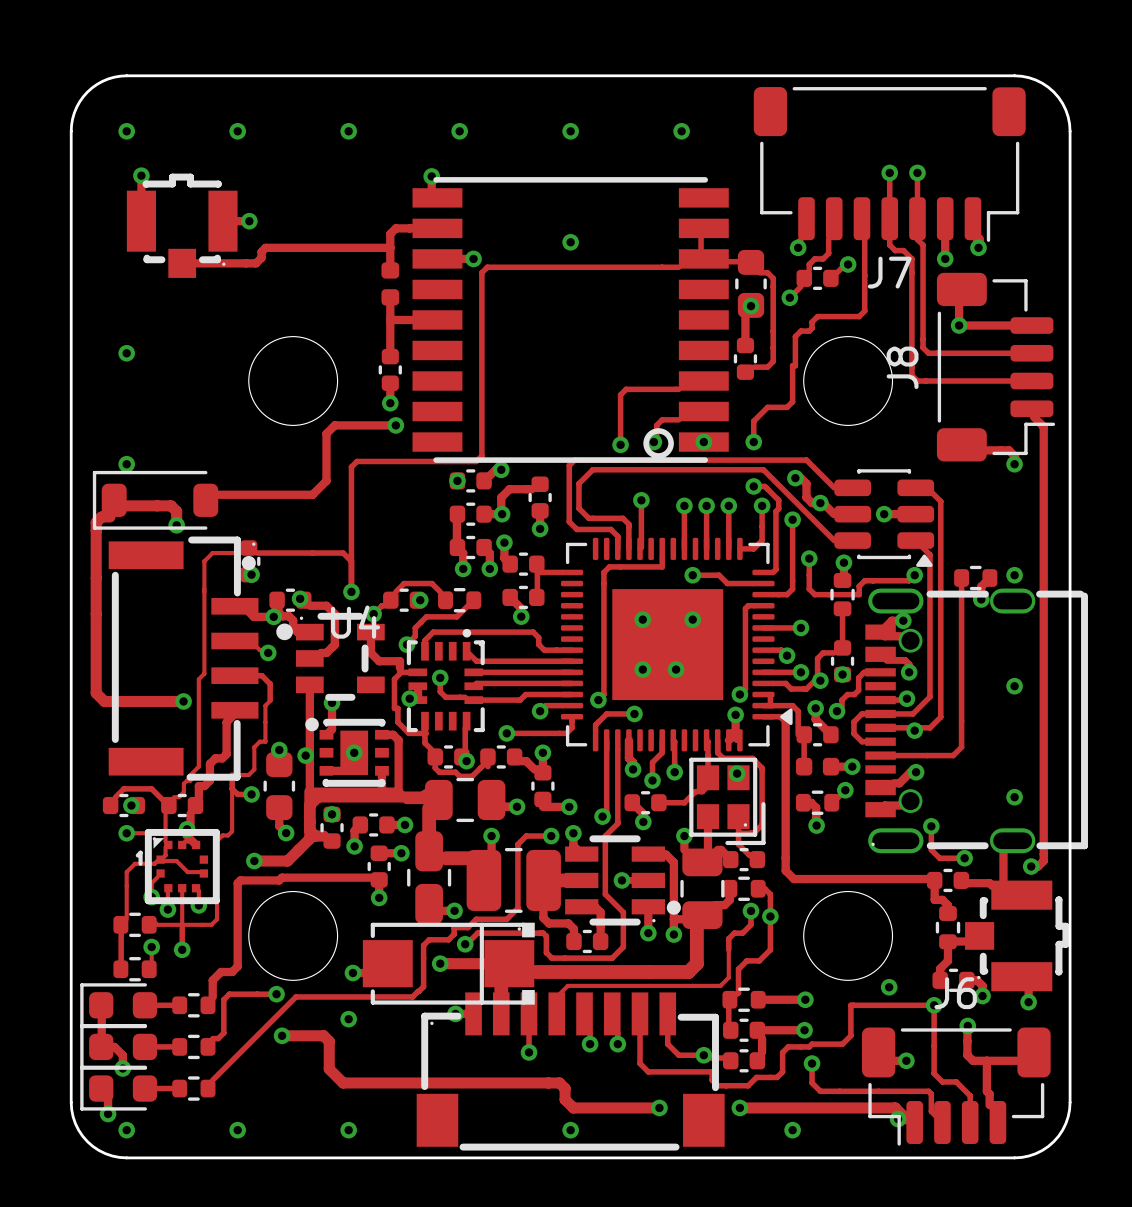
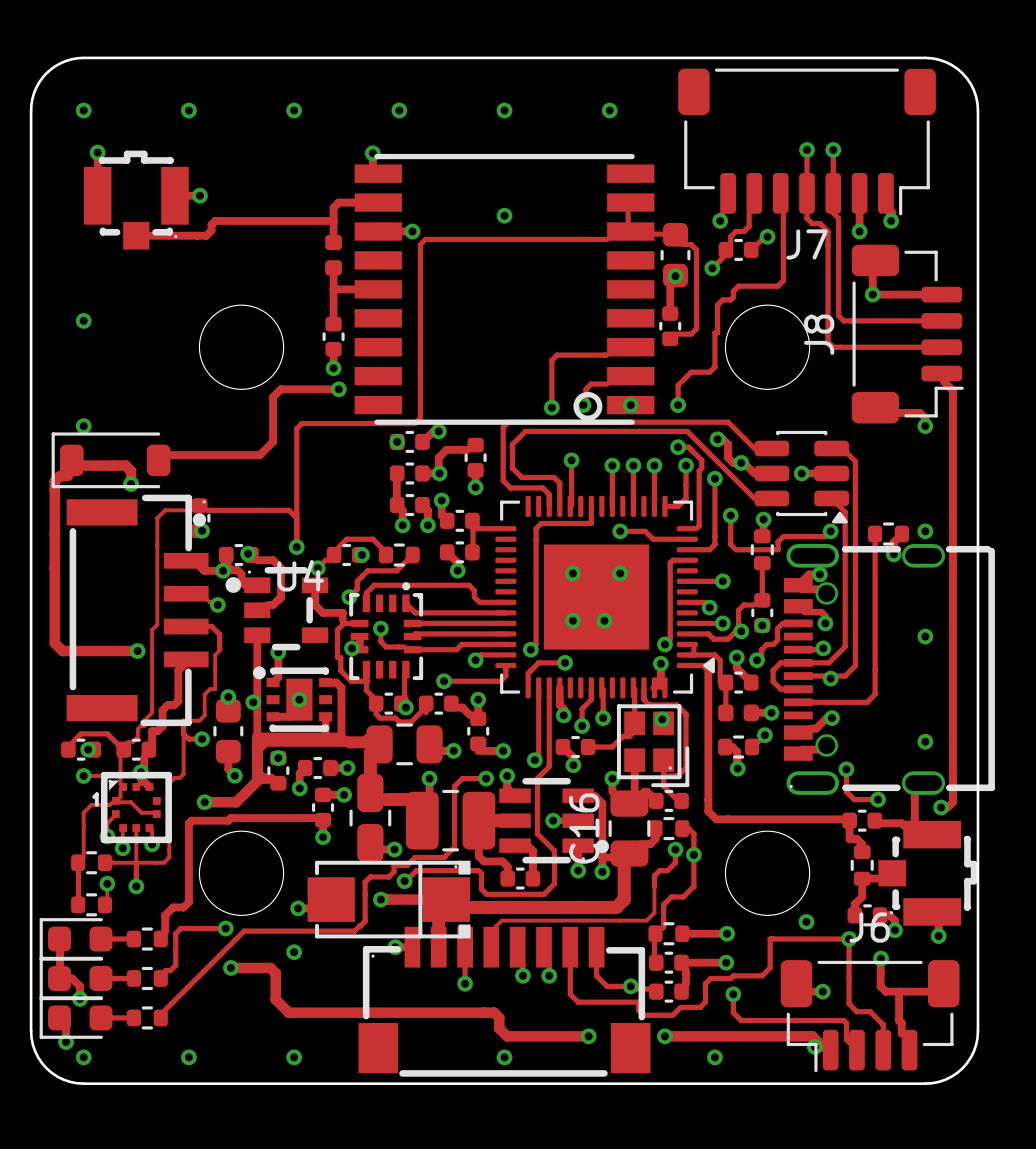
C16 name: none -> C16 (584, 828)

